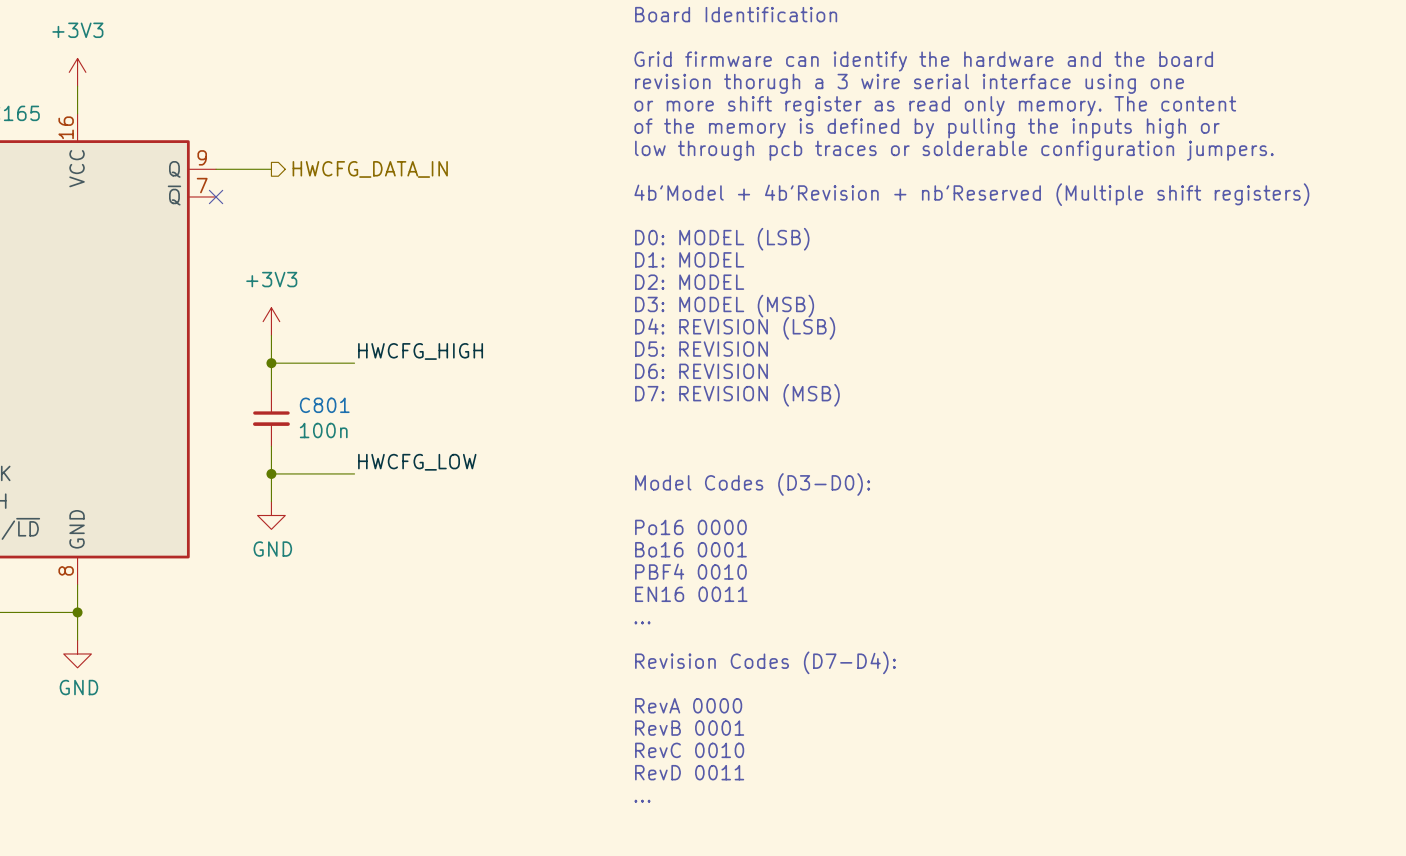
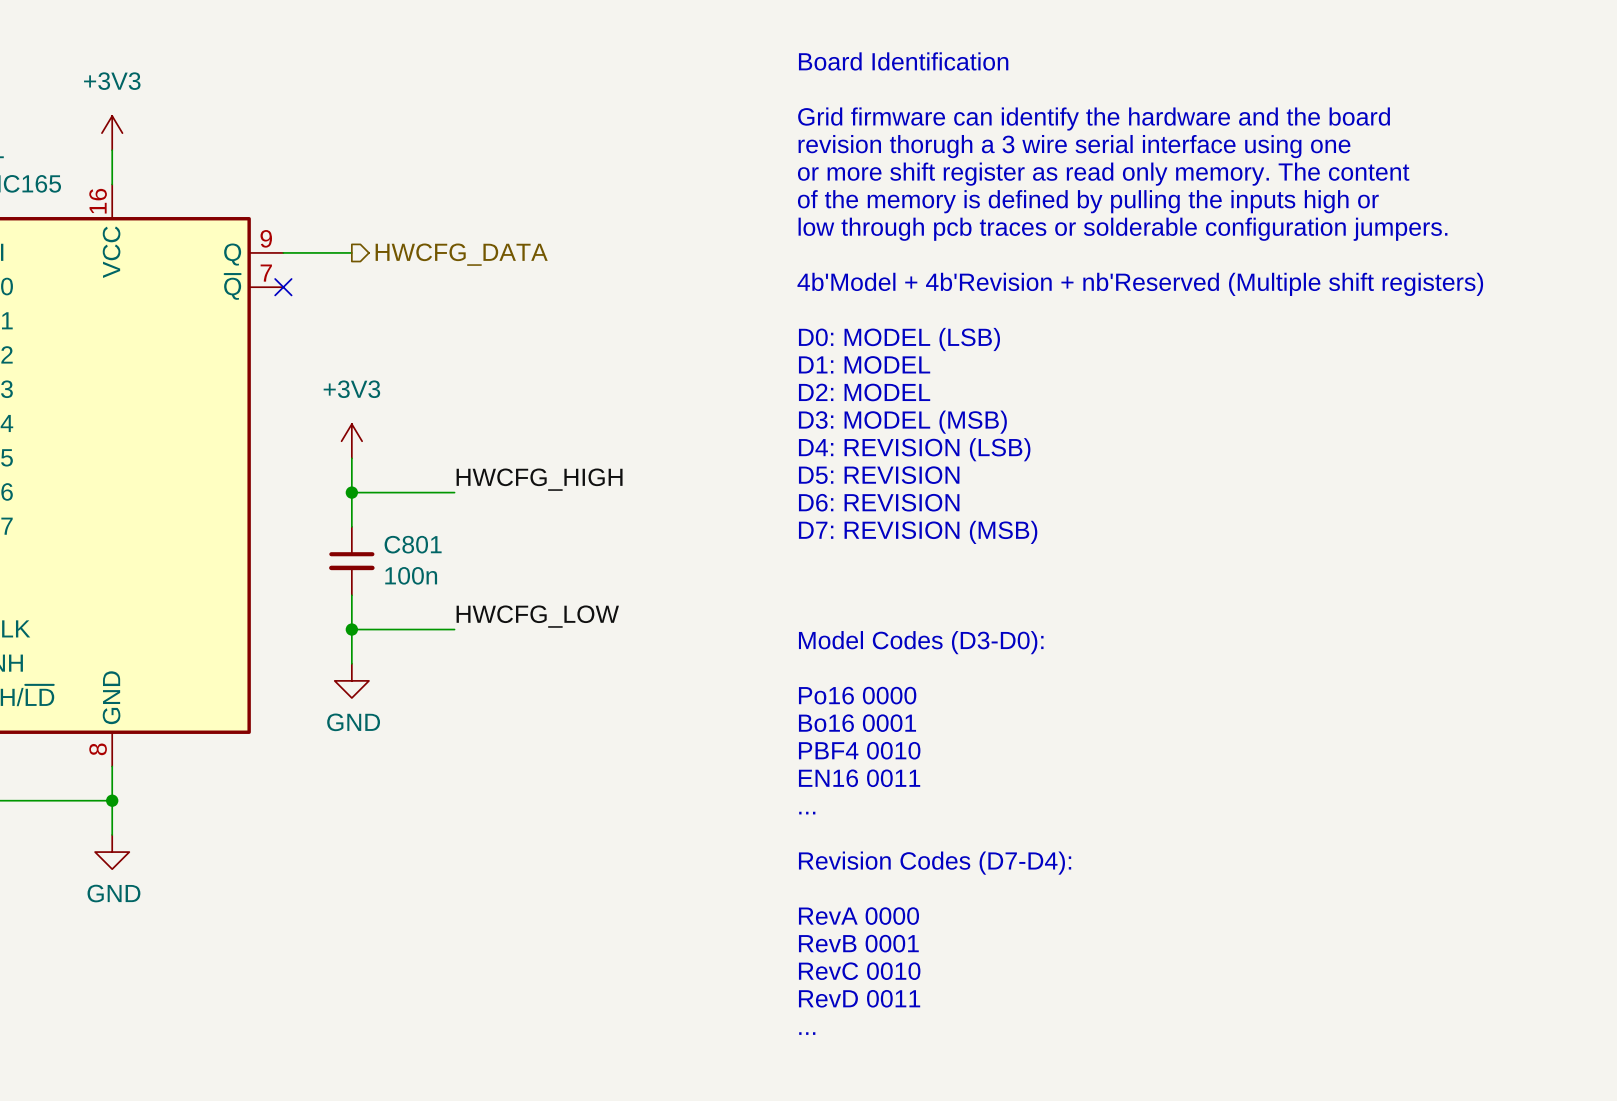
hierarchical label: HWCFG_DATA_IN (370, 169) -> HWCFG_DATA (461, 254)

